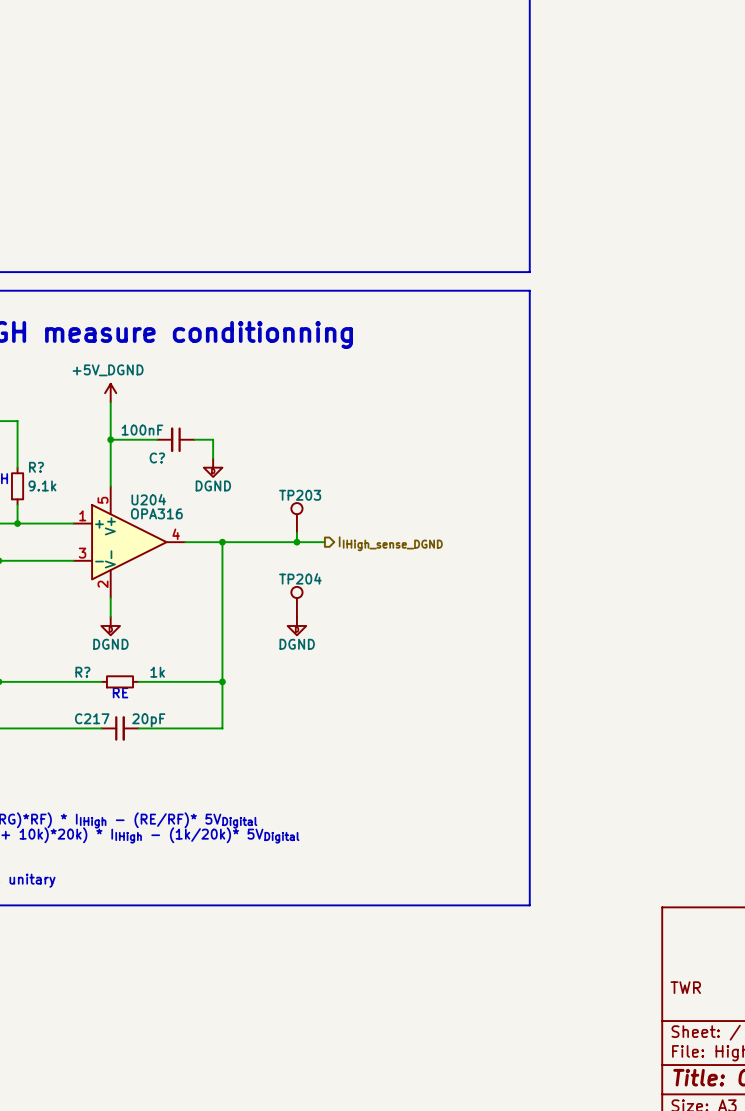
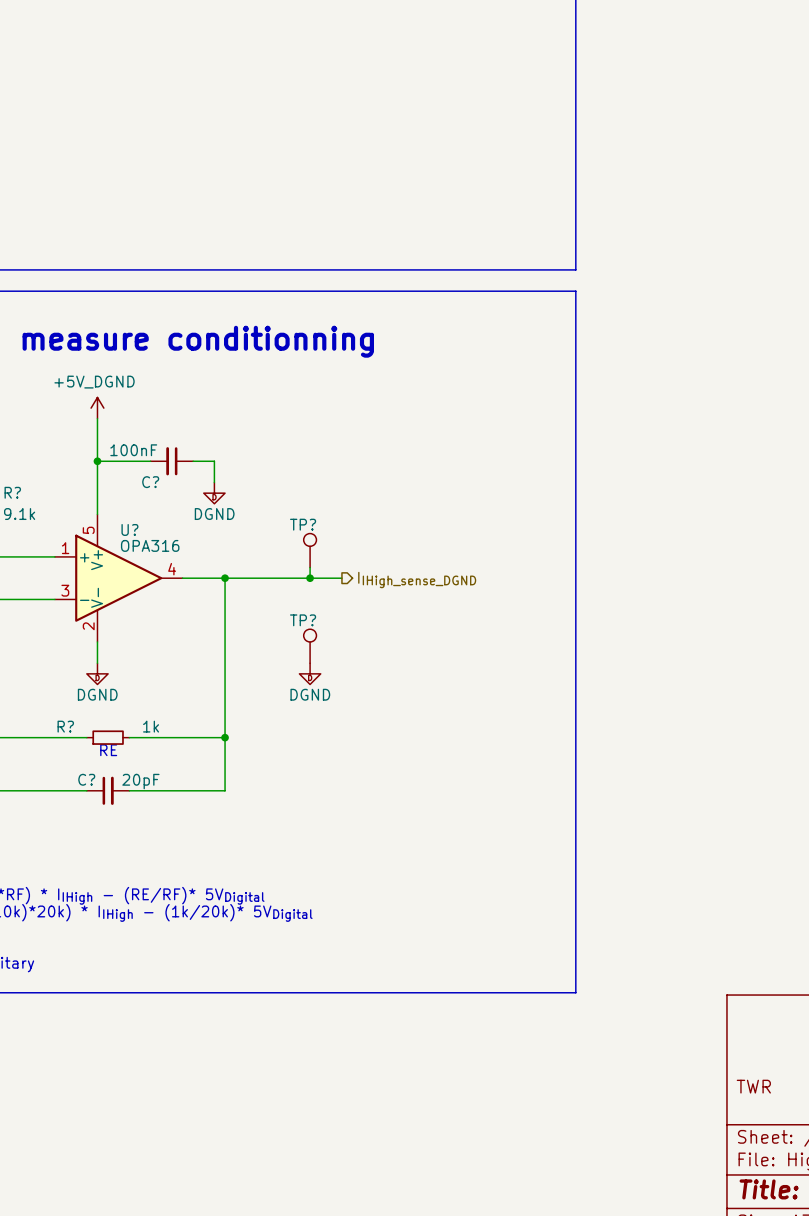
TP203 name: TP203 (300, 495) -> TP? (303, 524)
U204 name: U204 (148, 499) -> U? (129, 529)
TP204 name: TP204 (300, 578) -> TP? (303, 620)
C217 name: C217 (92, 718) -> C? (86, 779)

